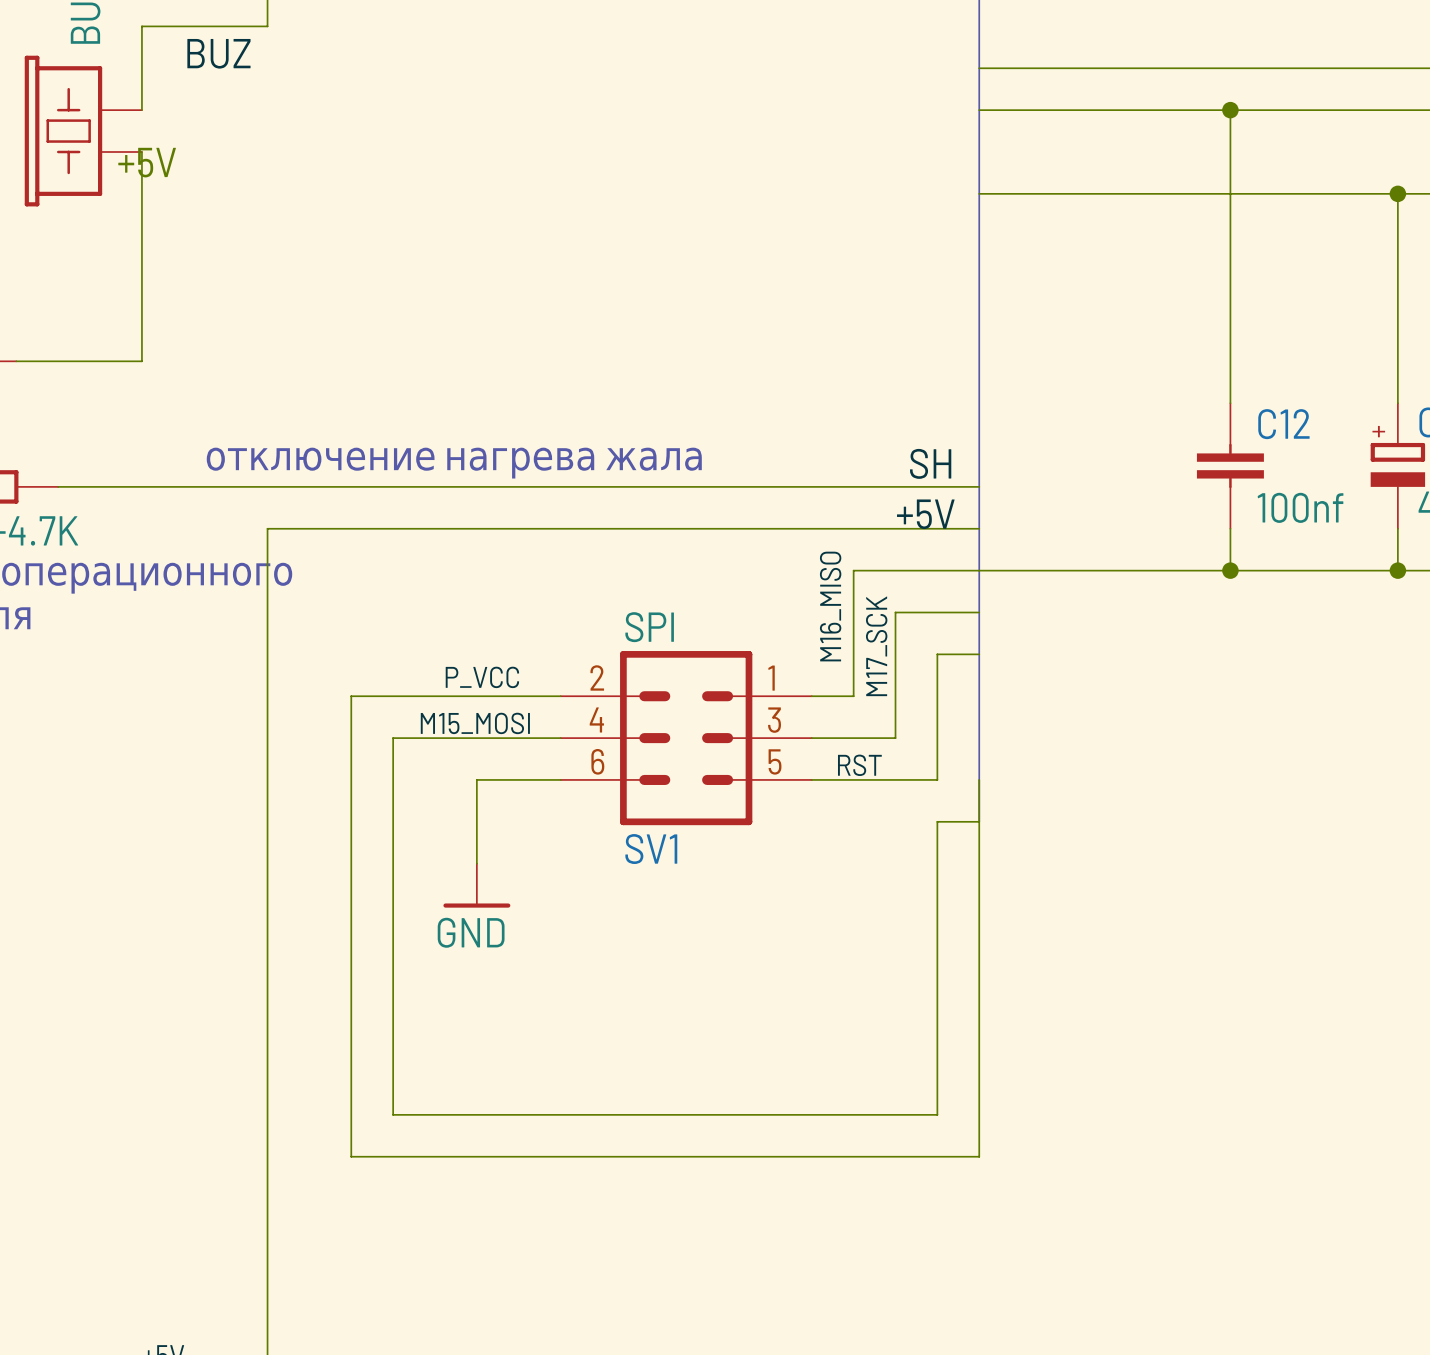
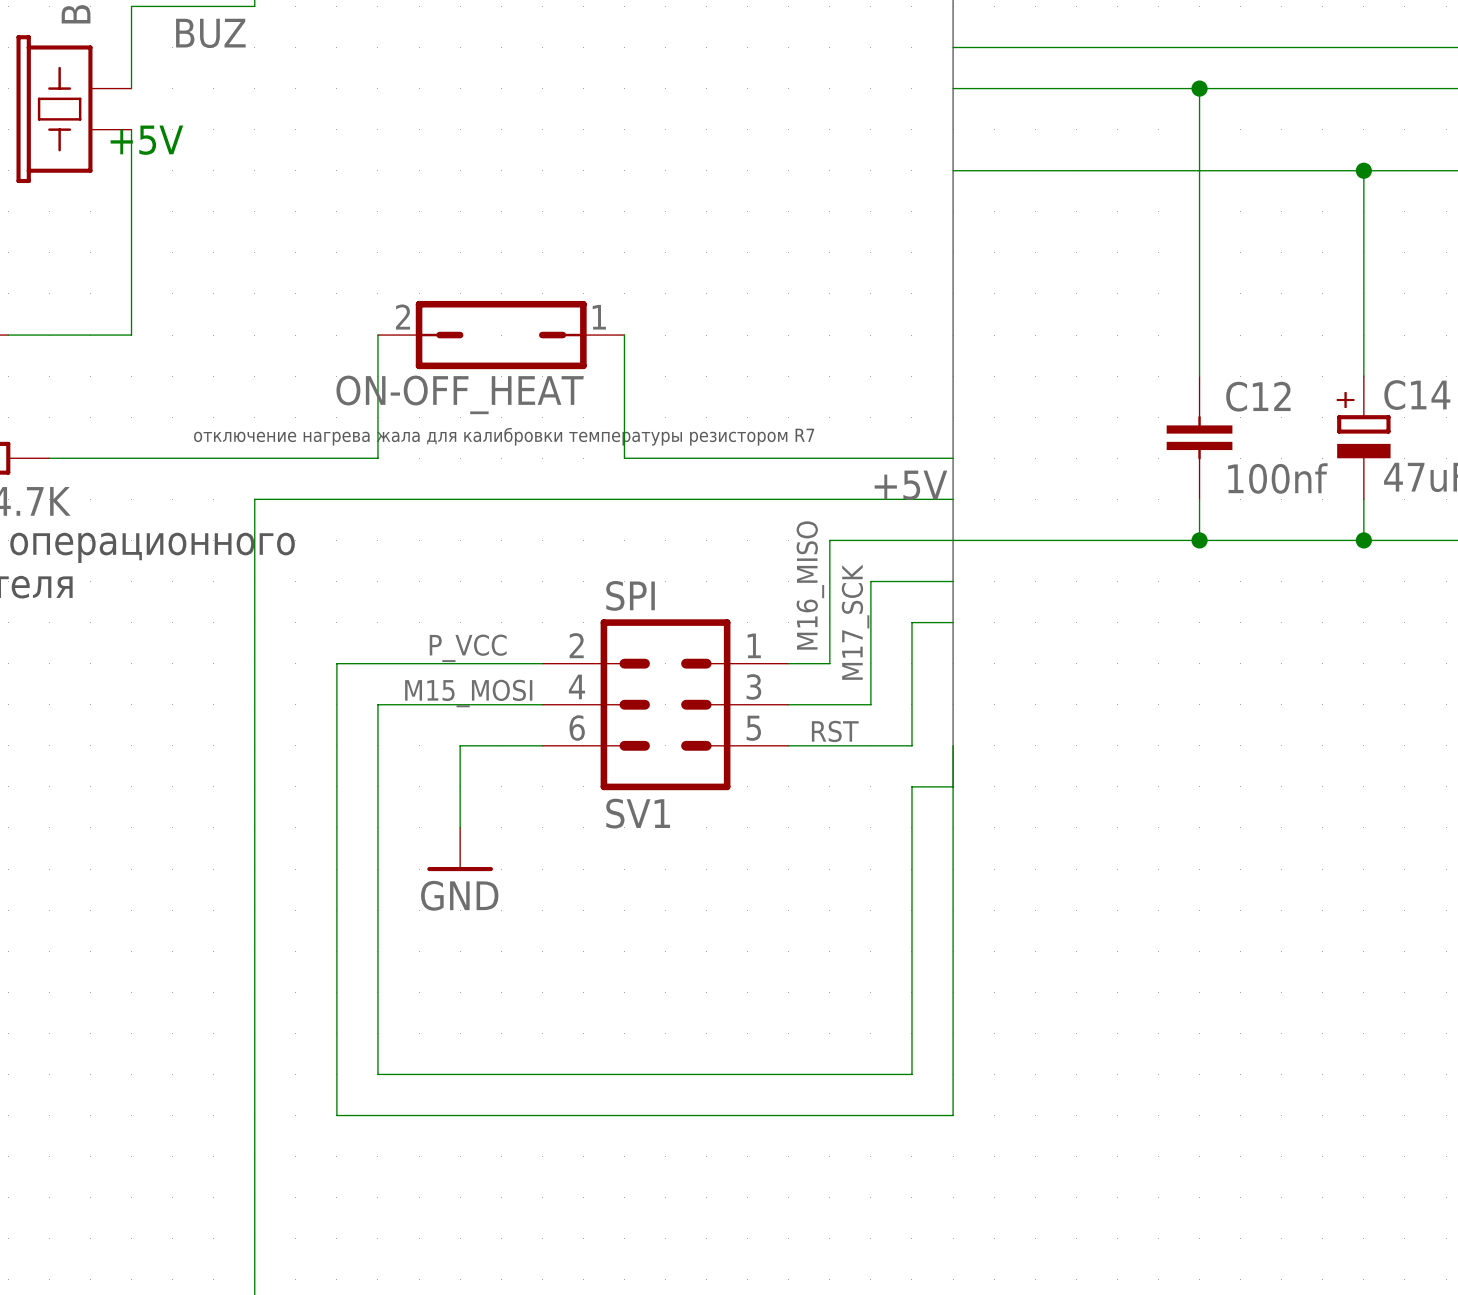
ON-OFF_HEAT: none -> (501, 335)
wire: none -> (624, 335) (624, 458)
text: отключение нагрева жала (454, 463) -> отключение нагрева жала для калибровки температуры резистором R7 (504, 436)
label: SH (930, 463) -> none
wire: (393, 486) (644, 486) -> (377, 458) (377, 335)

